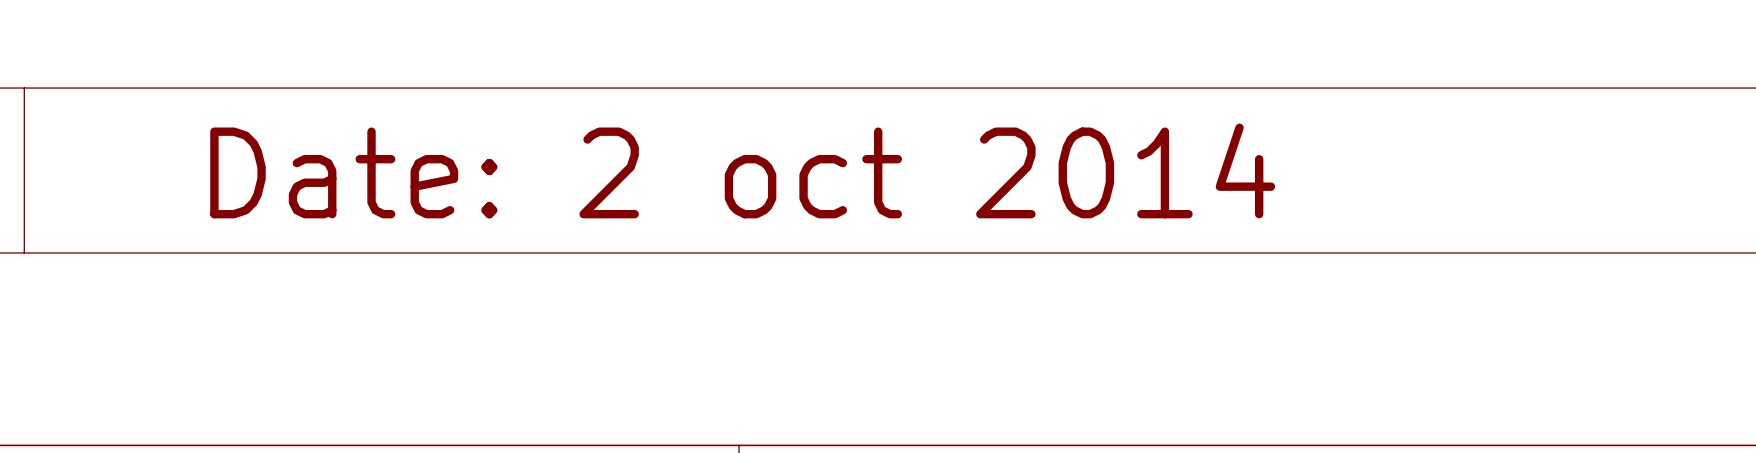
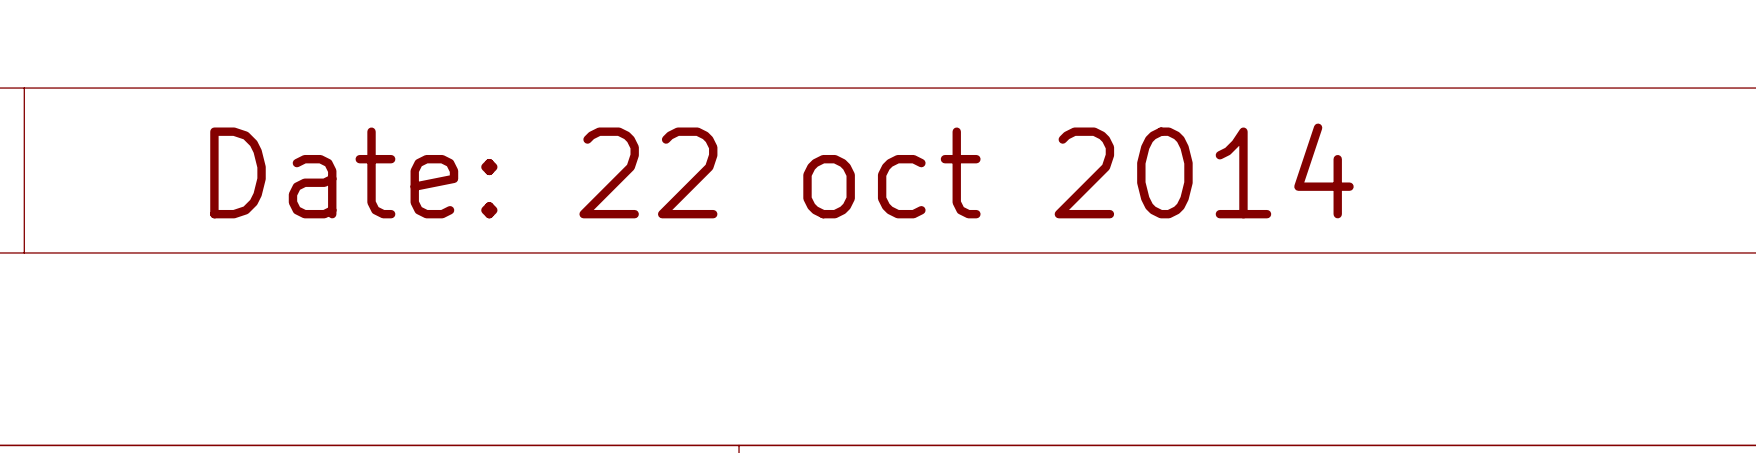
title block: Date: 2 oct 2014 (742, 170) -> Date: 22 oct 2014 (781, 170)

